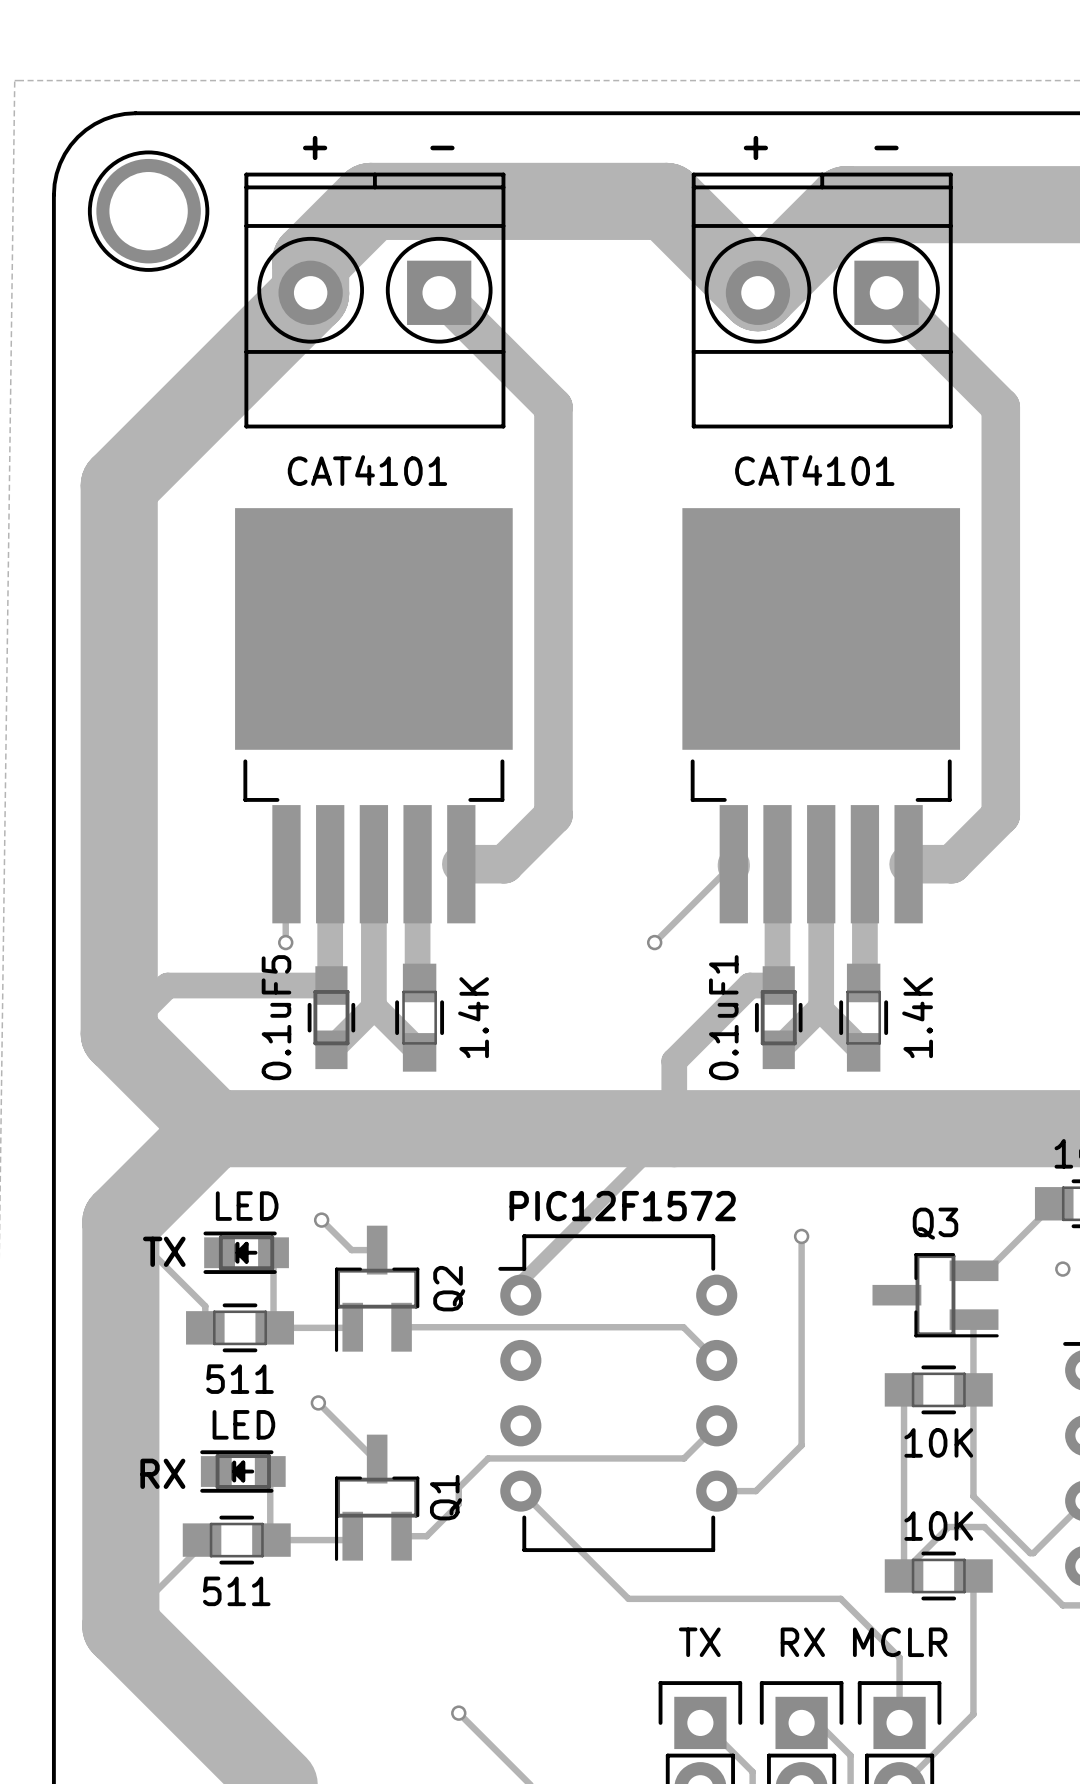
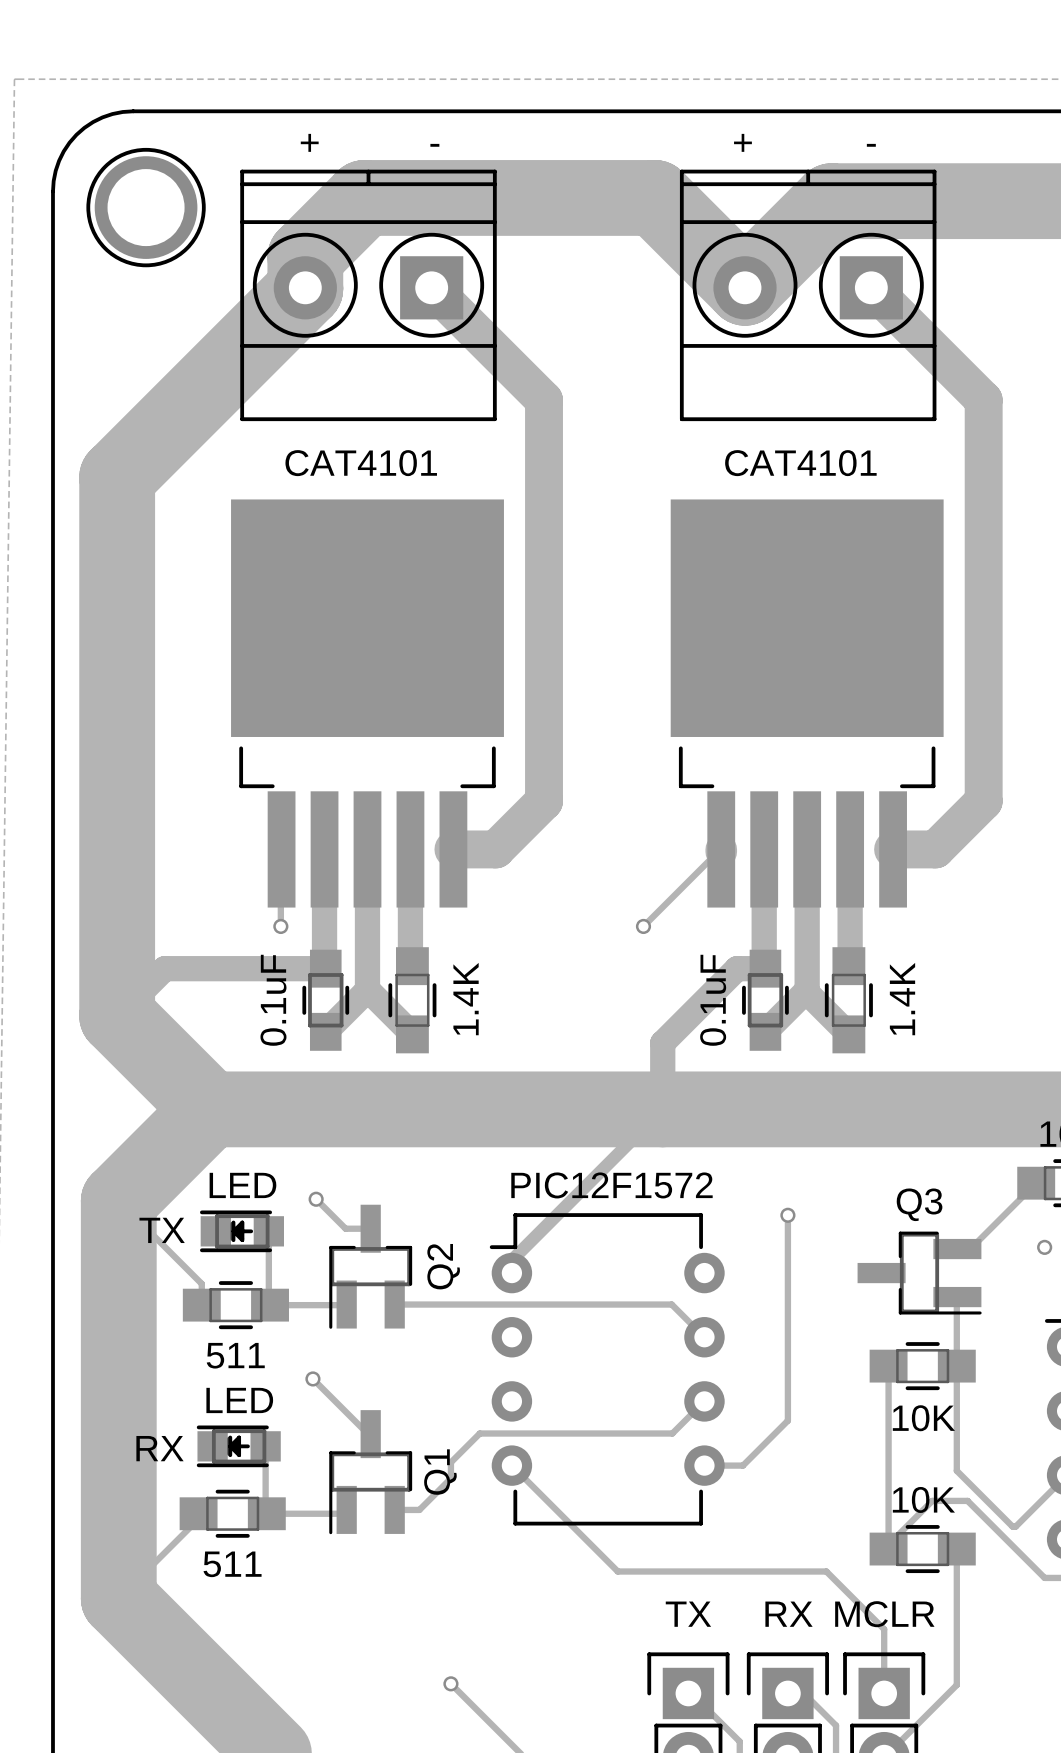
0.1uF5 name: 0.1uF5 (276, 1017) -> none
0.1uF5 value: none -> 0.1uF (273, 1000)
0.1uF1 name: 0.1uF1 (723, 1017) -> none
0.1uF1 value: none -> 0.1uF (713, 1000)

